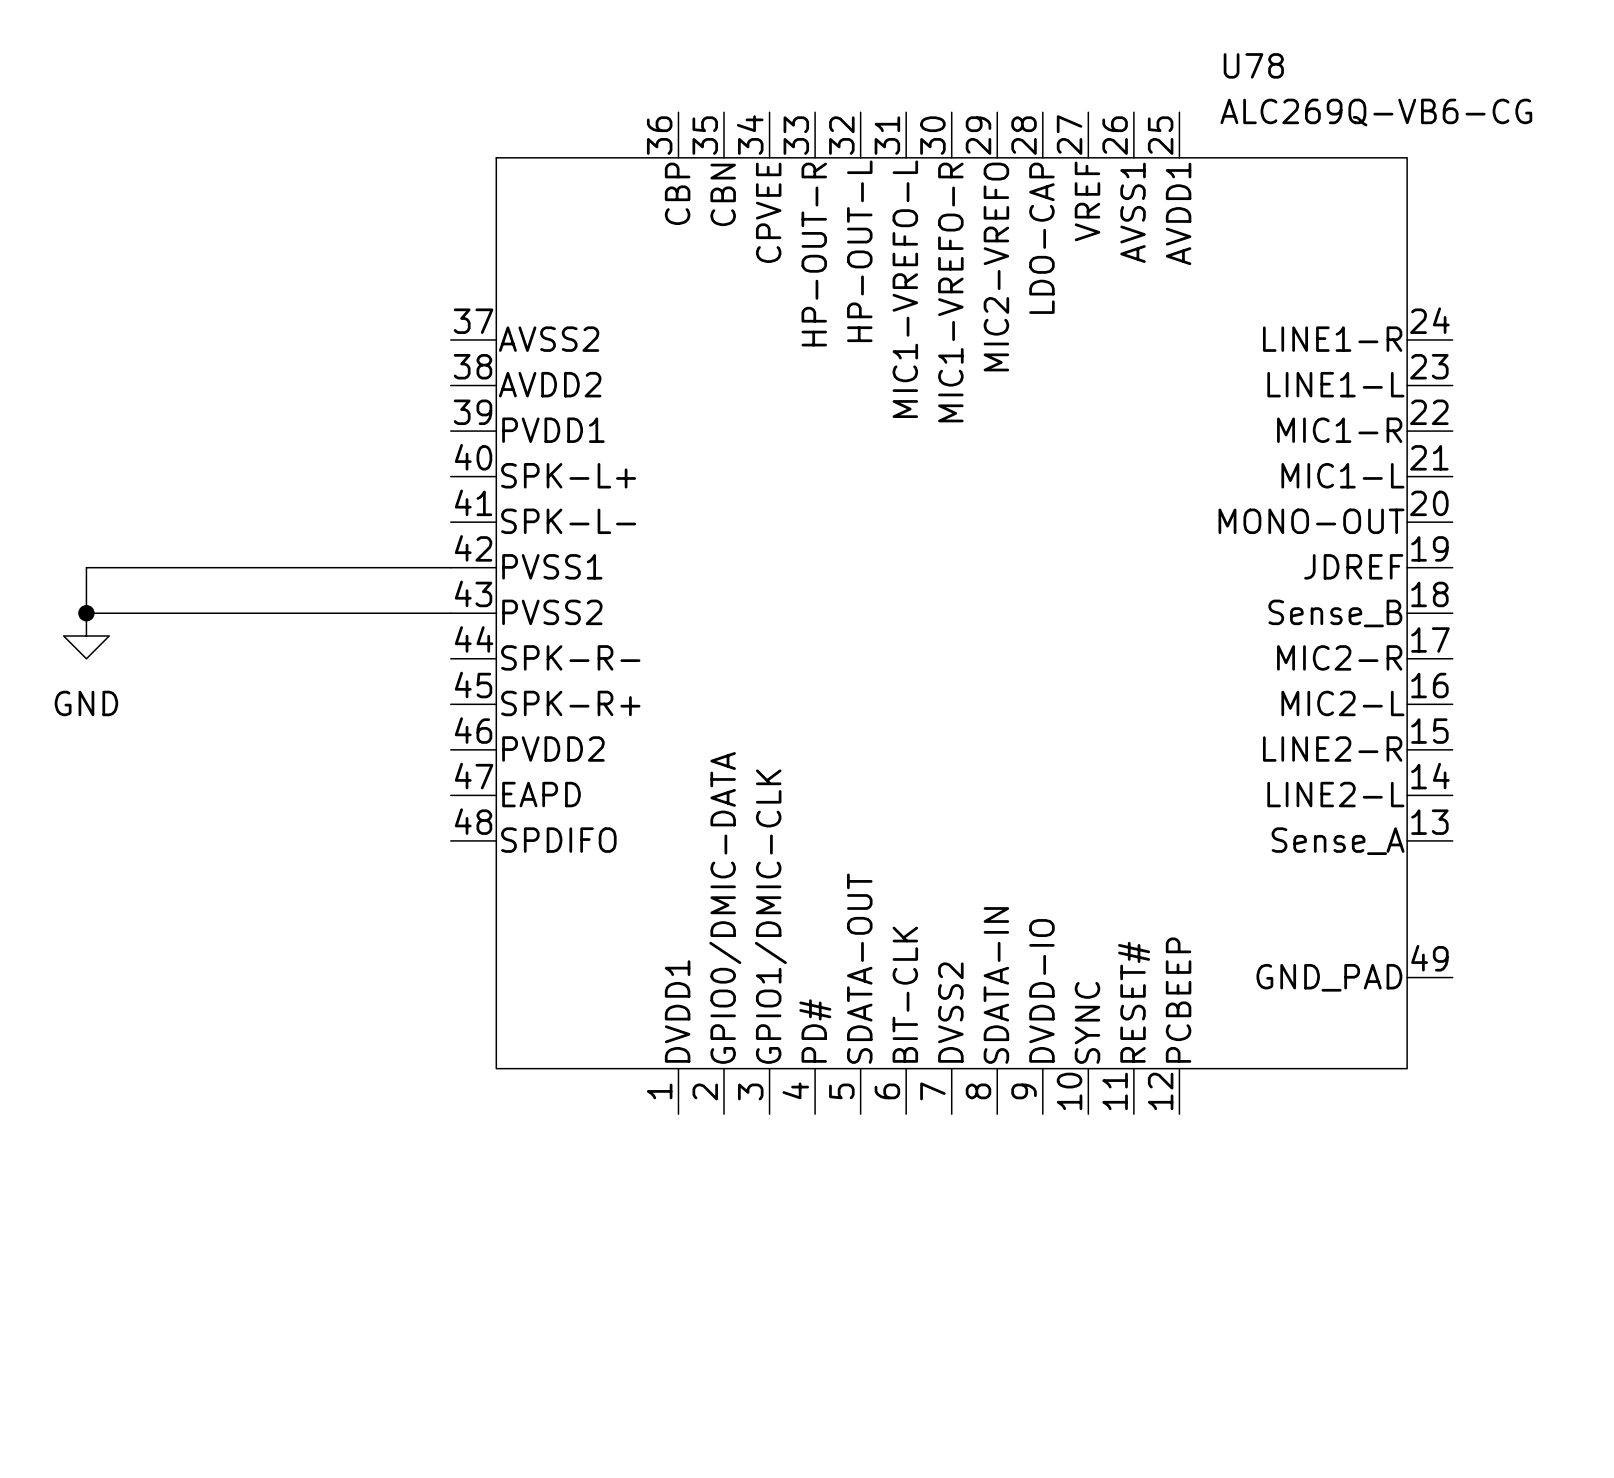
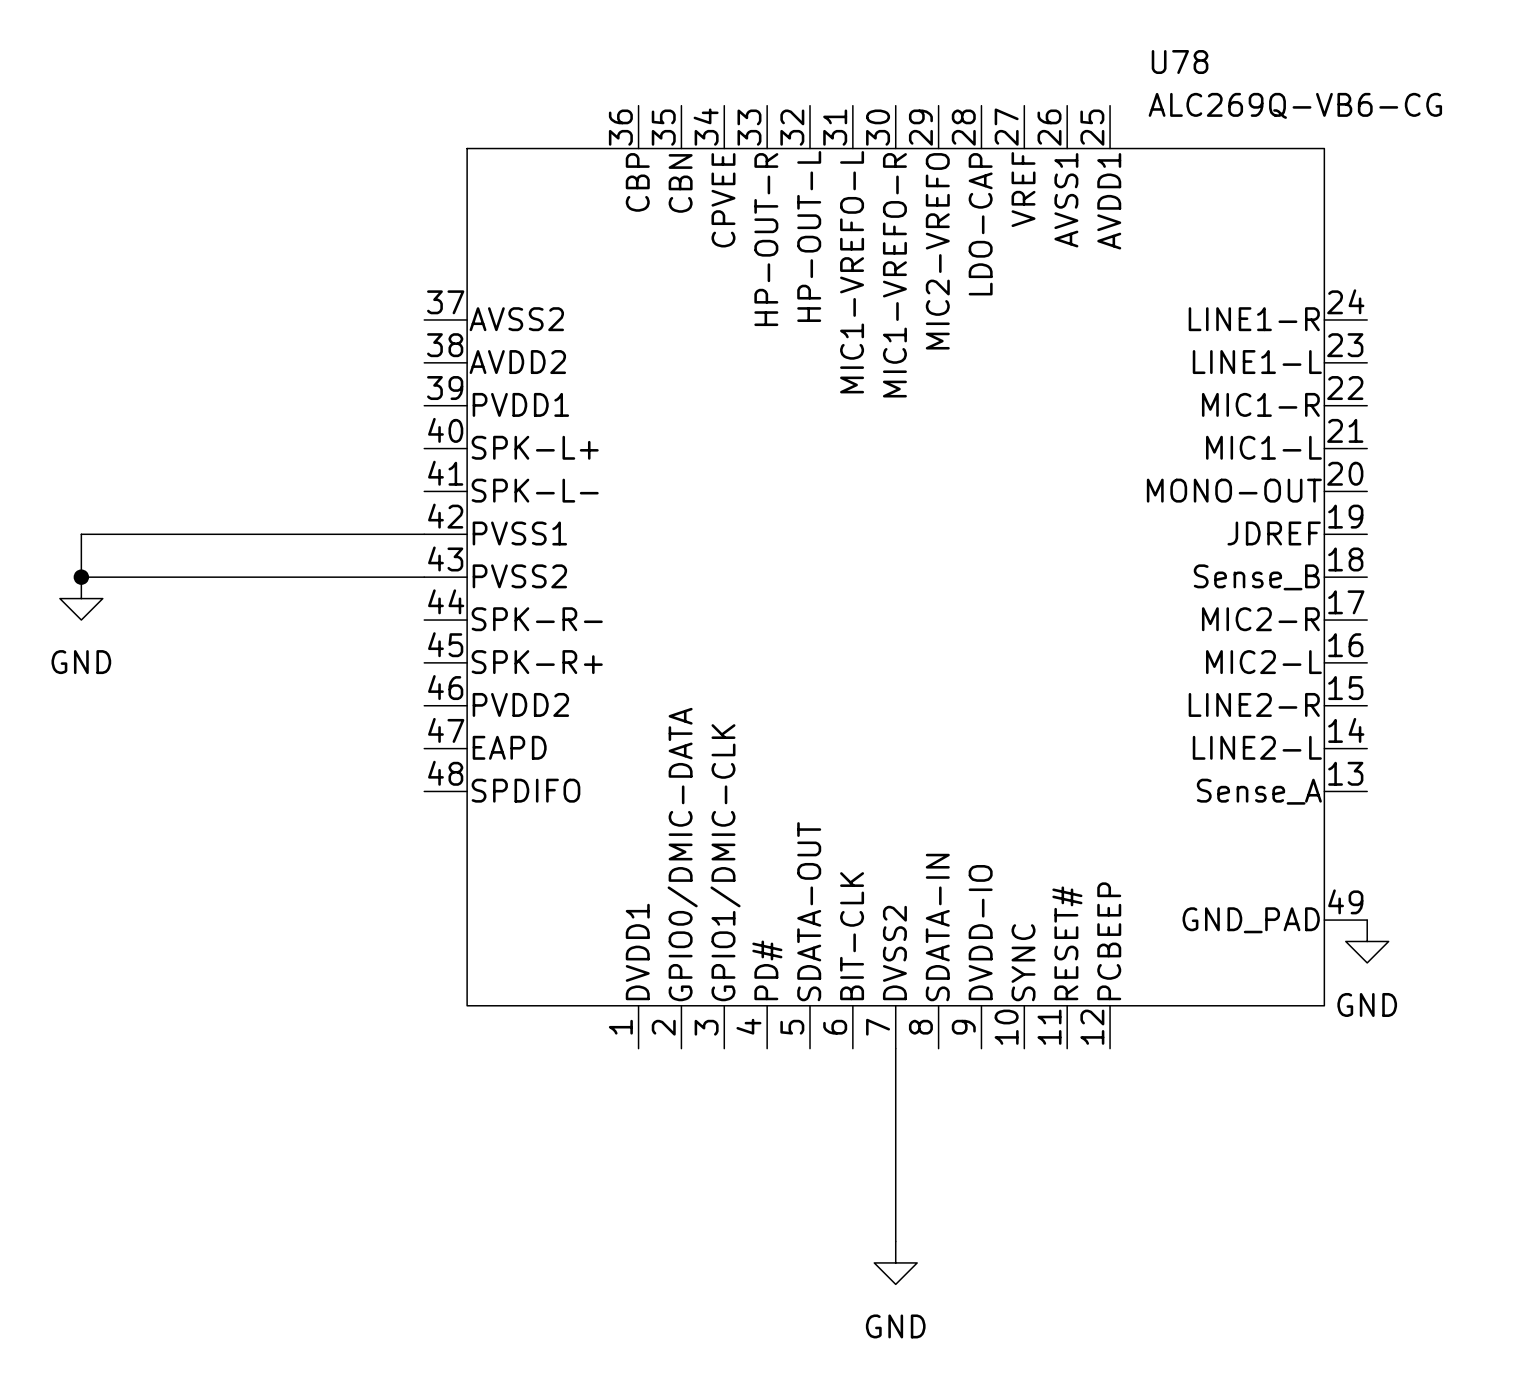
power symbol: none -> GND (1367, 941)
wire: none -> (895, 1048) (895, 1241)
power symbol: none -> GND (895, 1262)

